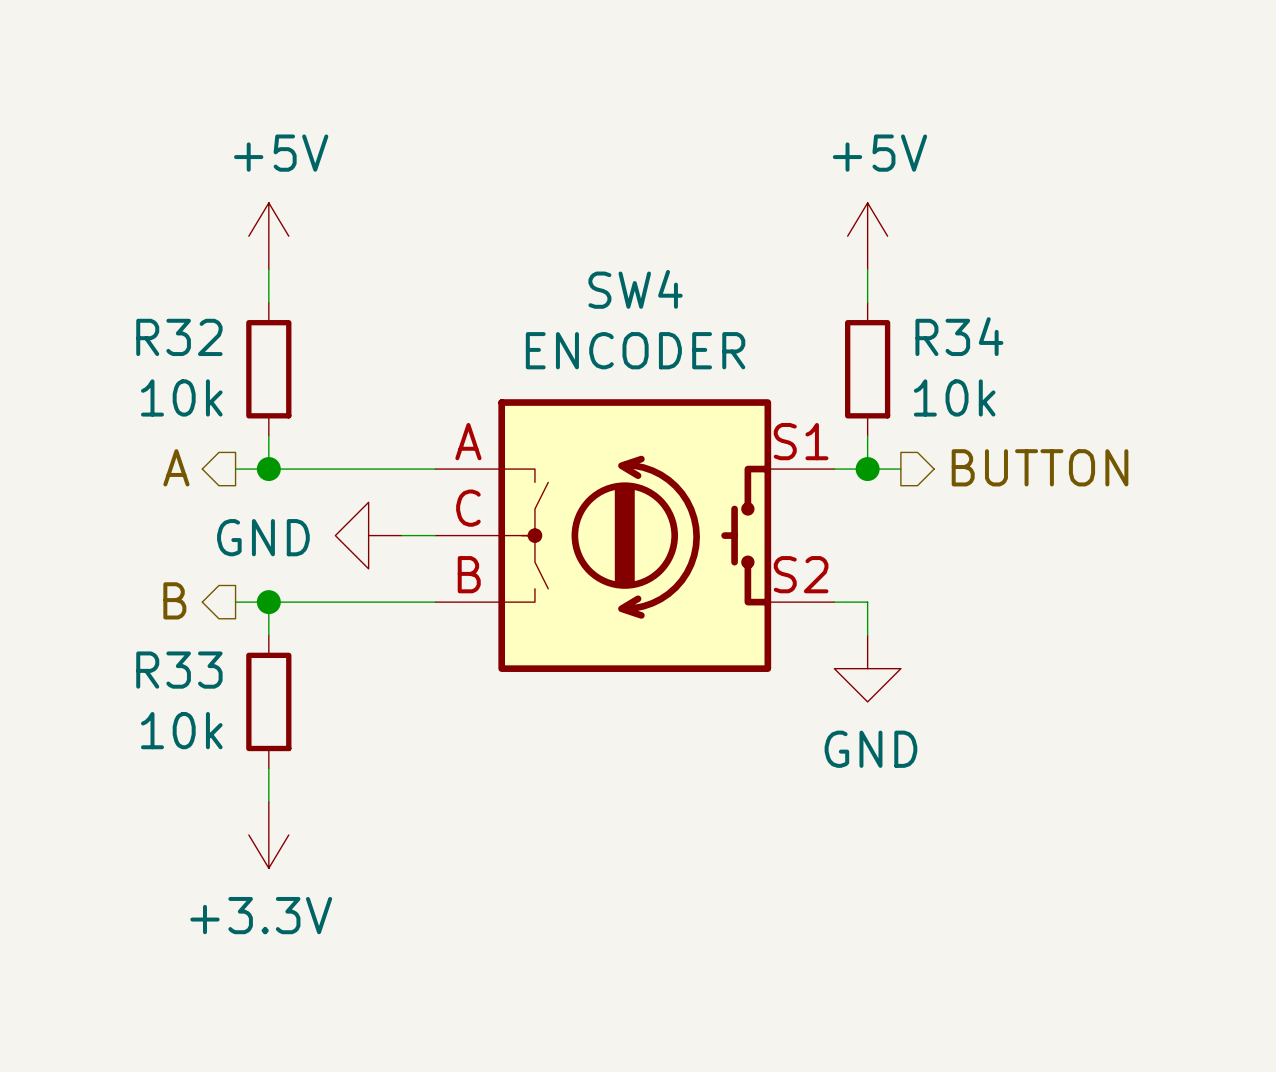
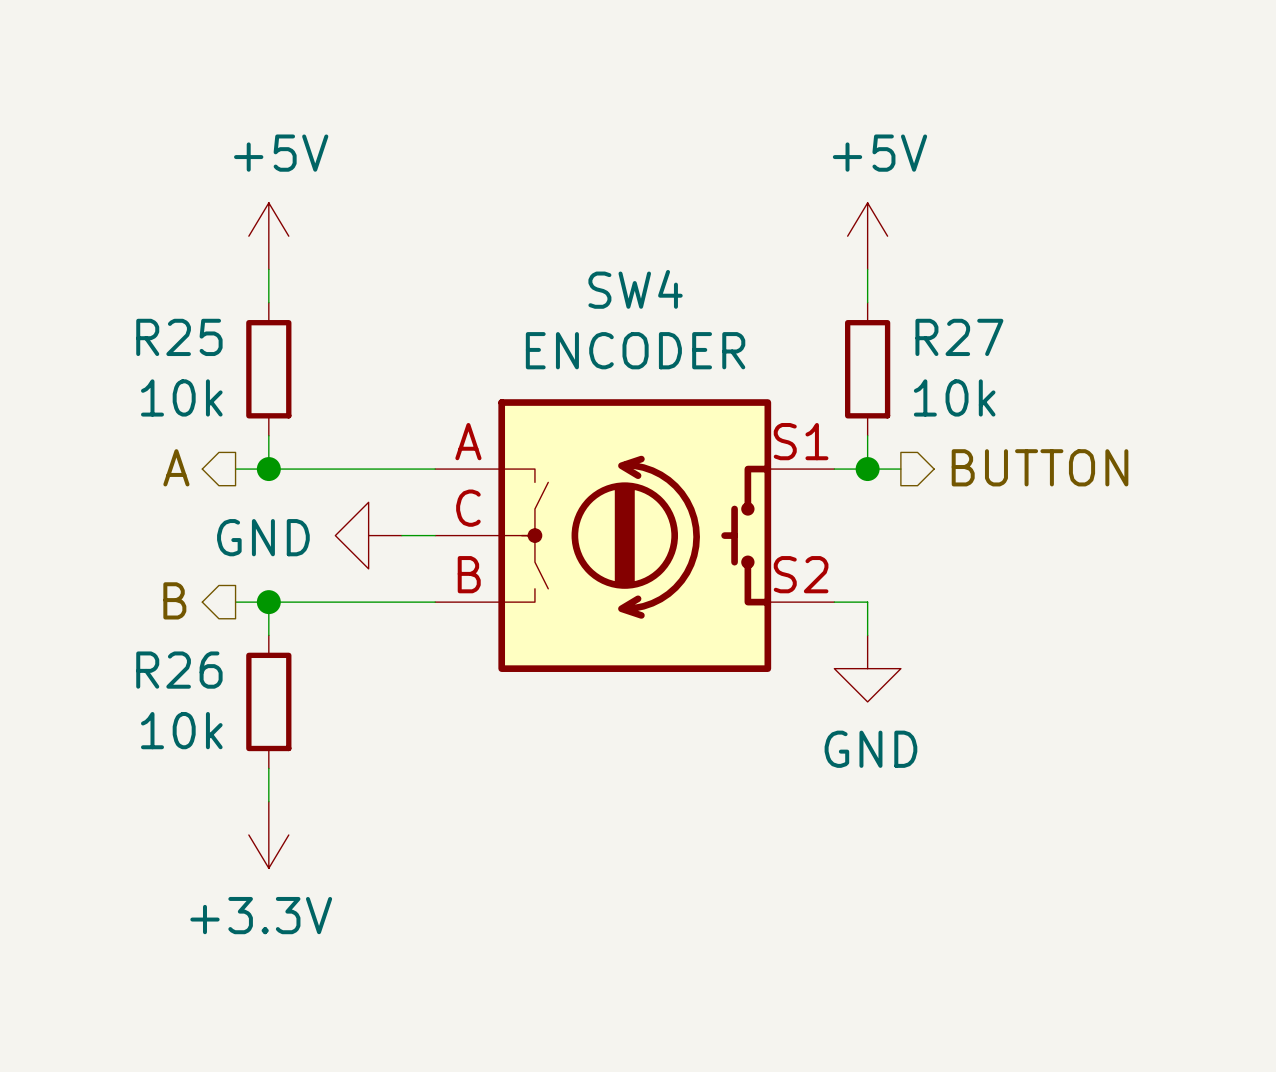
R34 name: R34 (959, 336) -> R27 (959, 337)
R32 name: R32 (179, 337) -> R25 (179, 337)
R33 name: R33 (179, 670) -> R26 (179, 670)

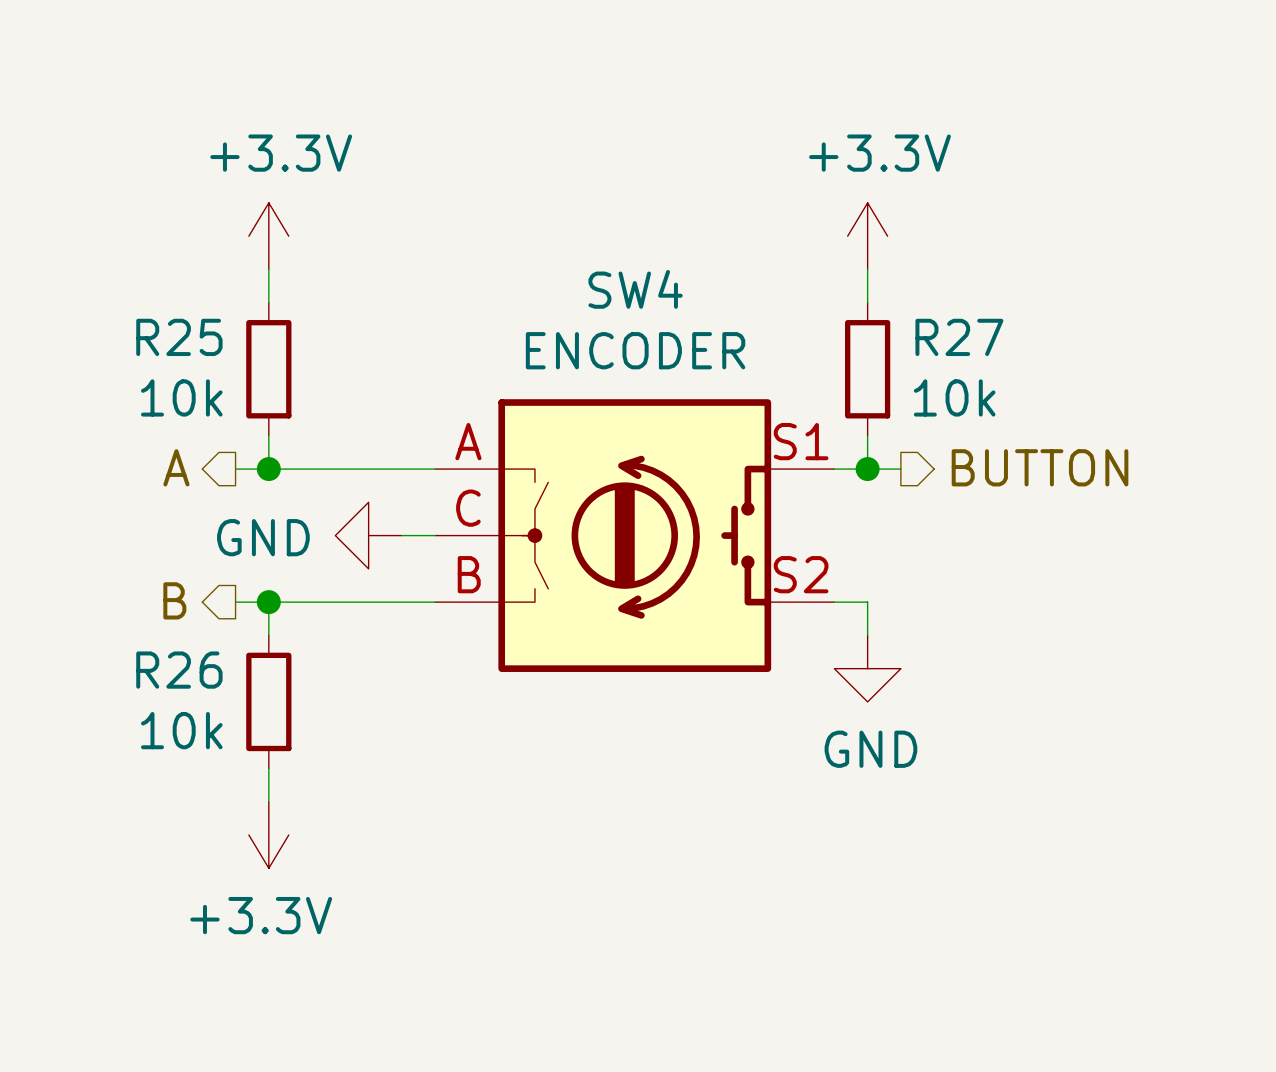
power symbol: +5V (268, 236) -> +3.3V (268, 236)
power symbol: +5V (867, 236) -> +3.3V (867, 236)

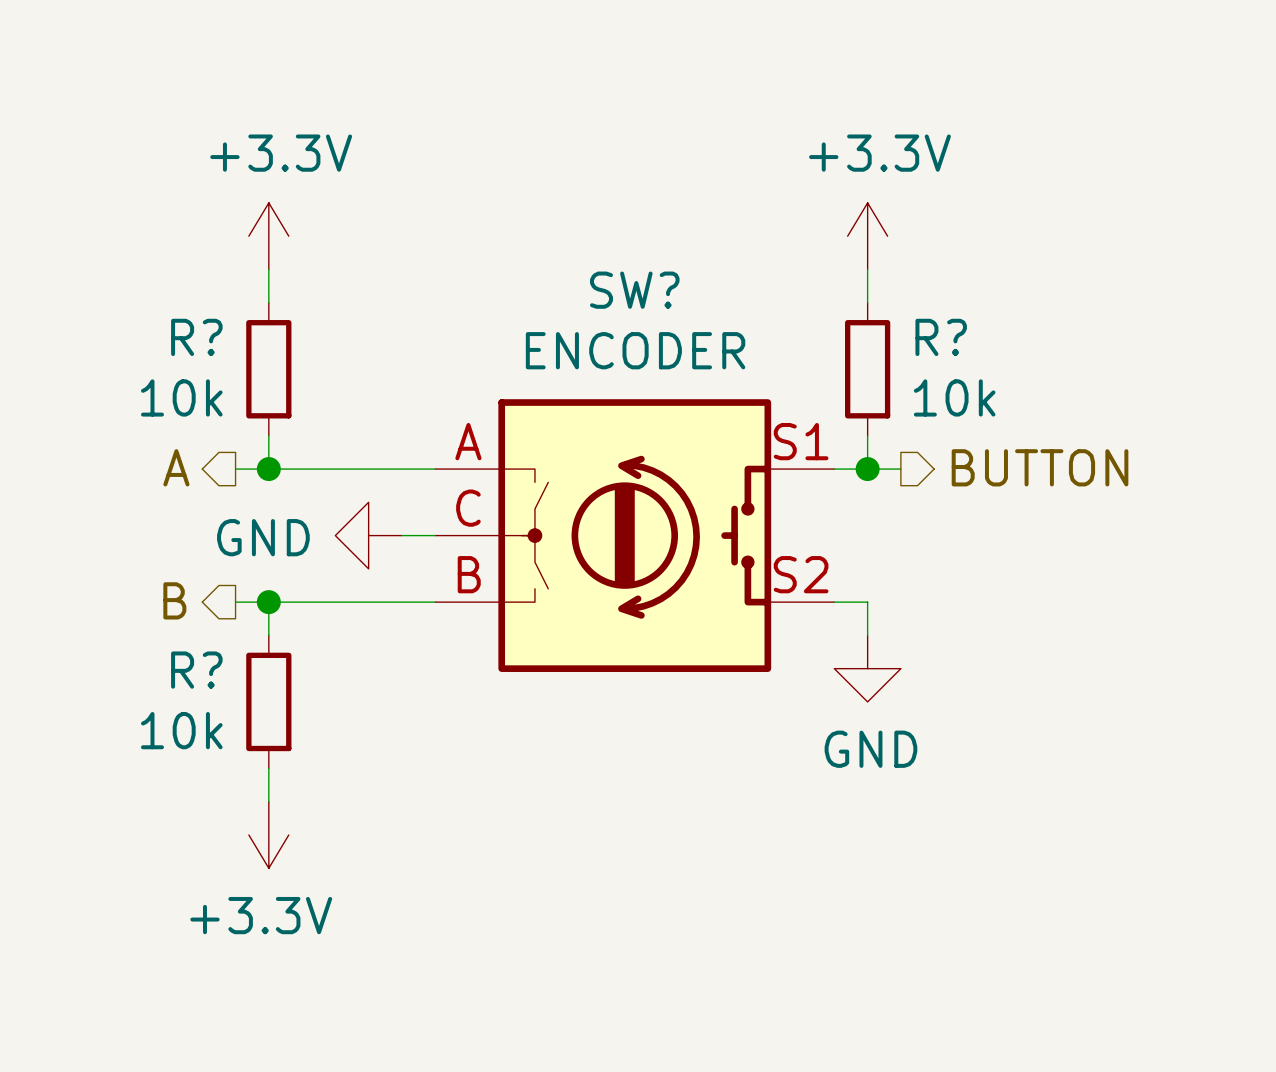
SW4 name: SW4 (635, 289) -> SW? (634, 290)
R25 name: R25 (179, 337) -> R? (196, 337)
R27 name: R27 (959, 337) -> R? (941, 337)
R26 name: R26 (179, 670) -> R? (196, 670)

